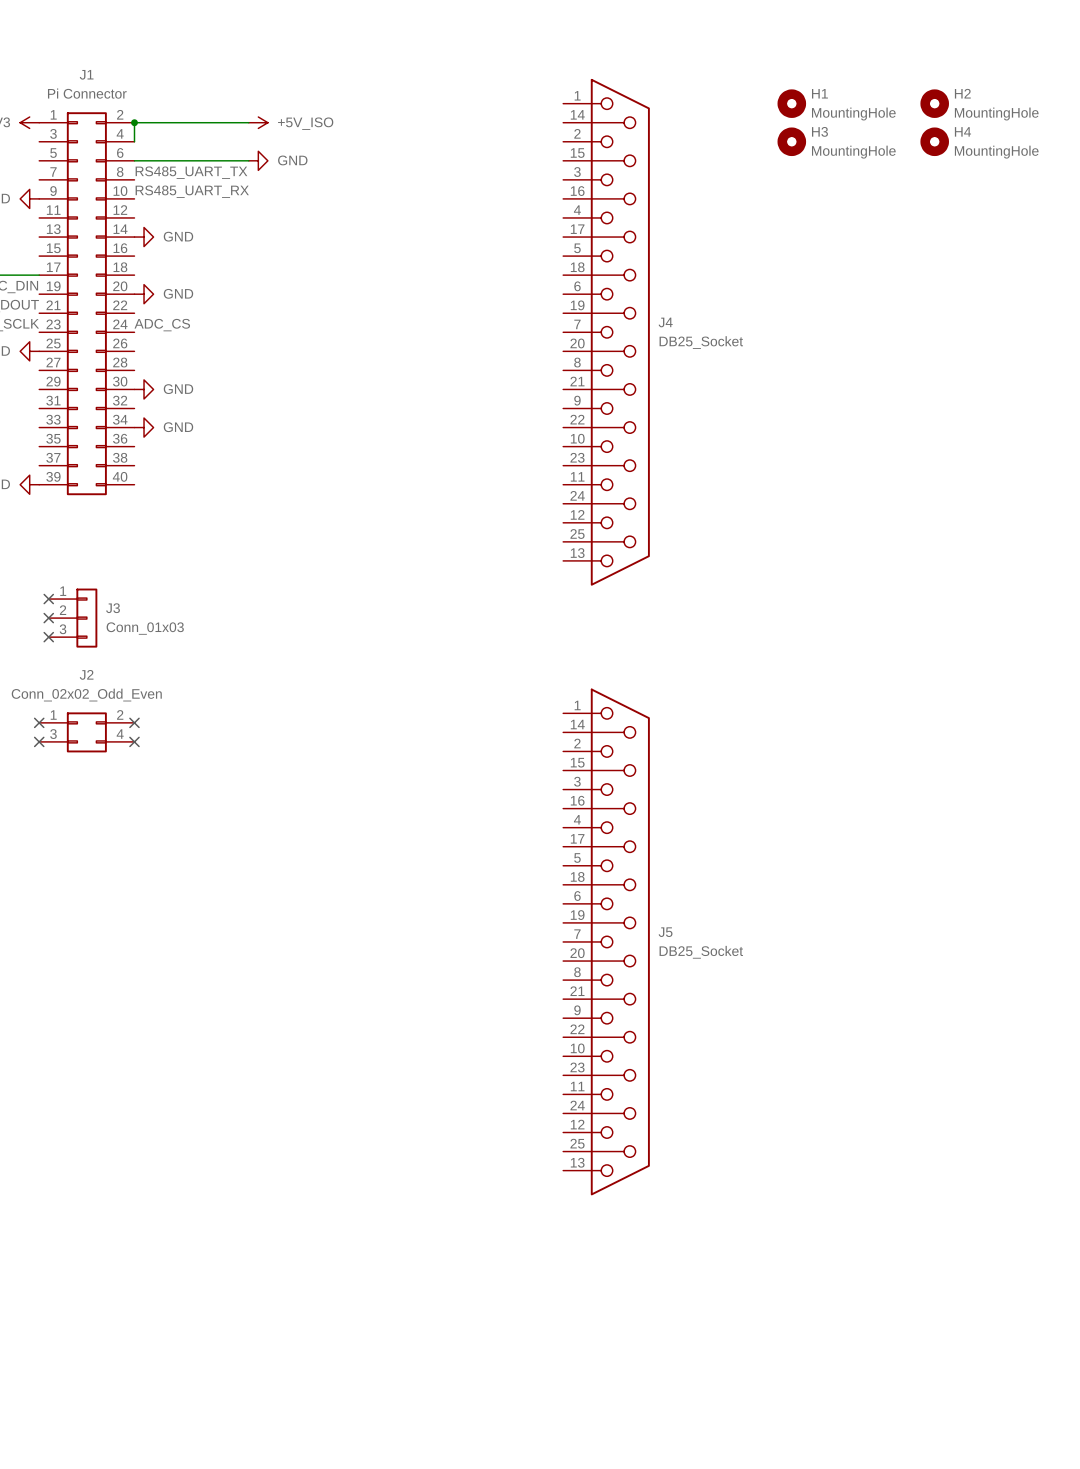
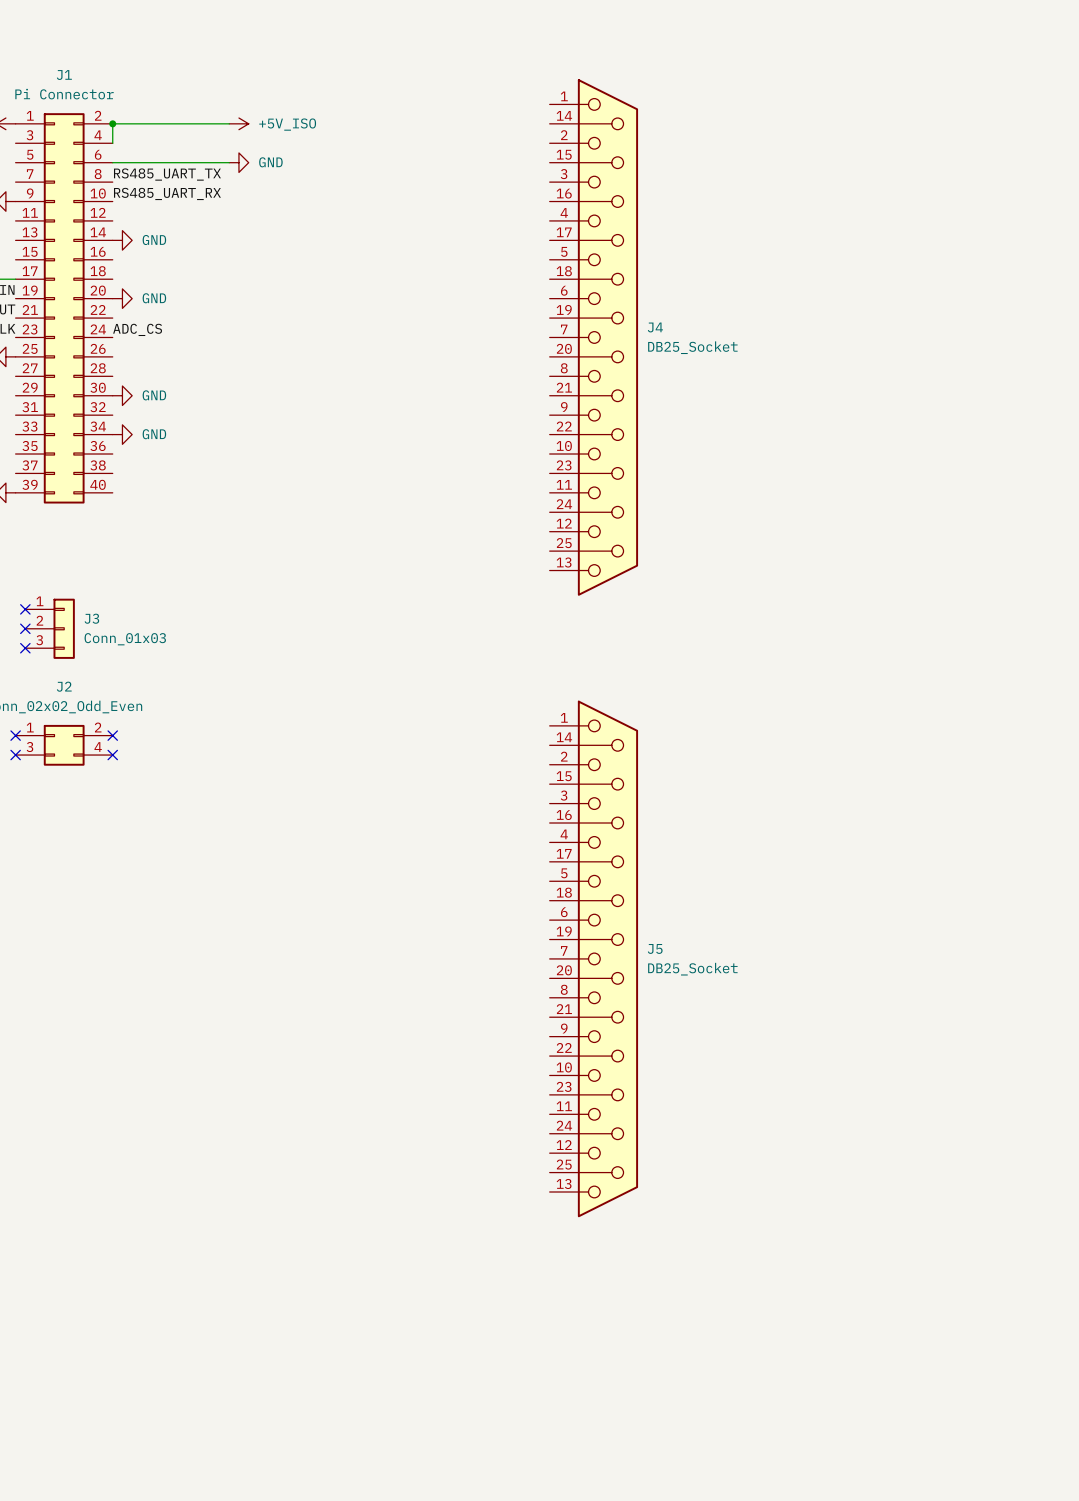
H1: MountingHole (791, 103) -> none
H2: MountingHole (934, 103) -> none
H3: MountingHole (791, 141) -> none
H4: MountingHole (934, 141) -> none

